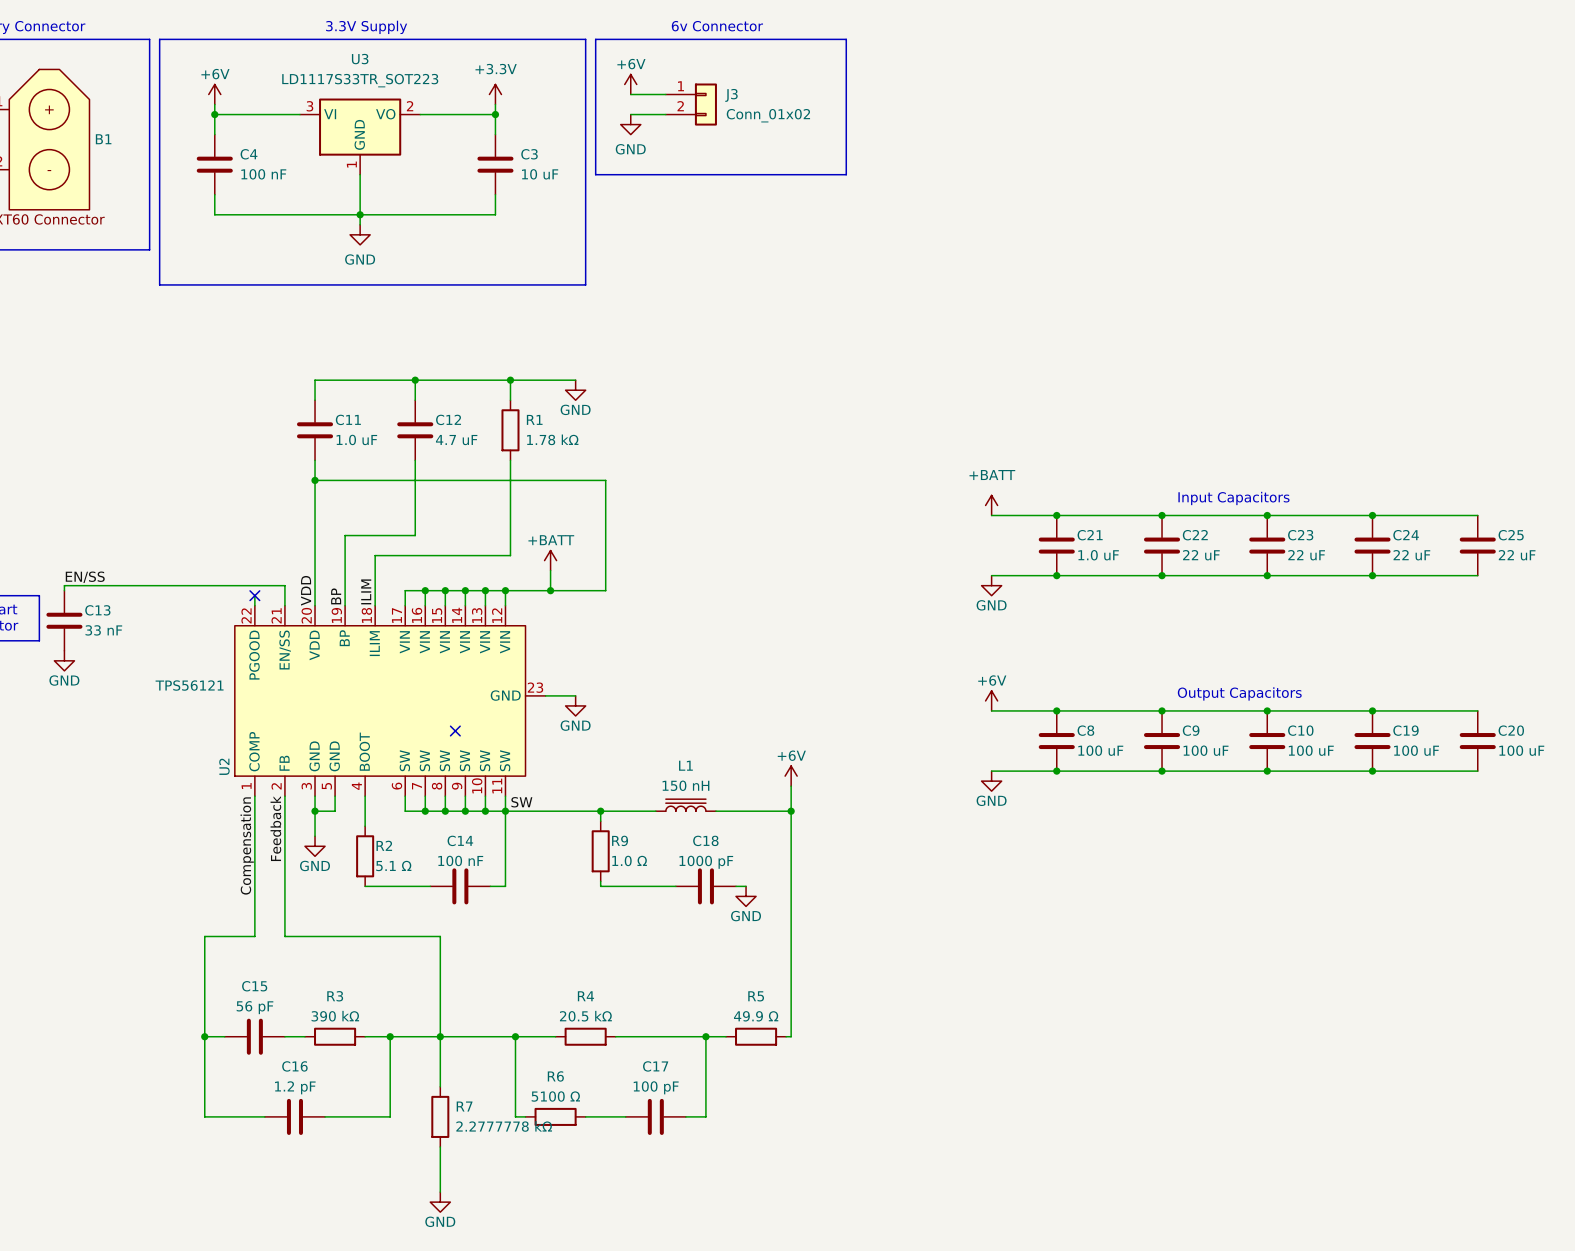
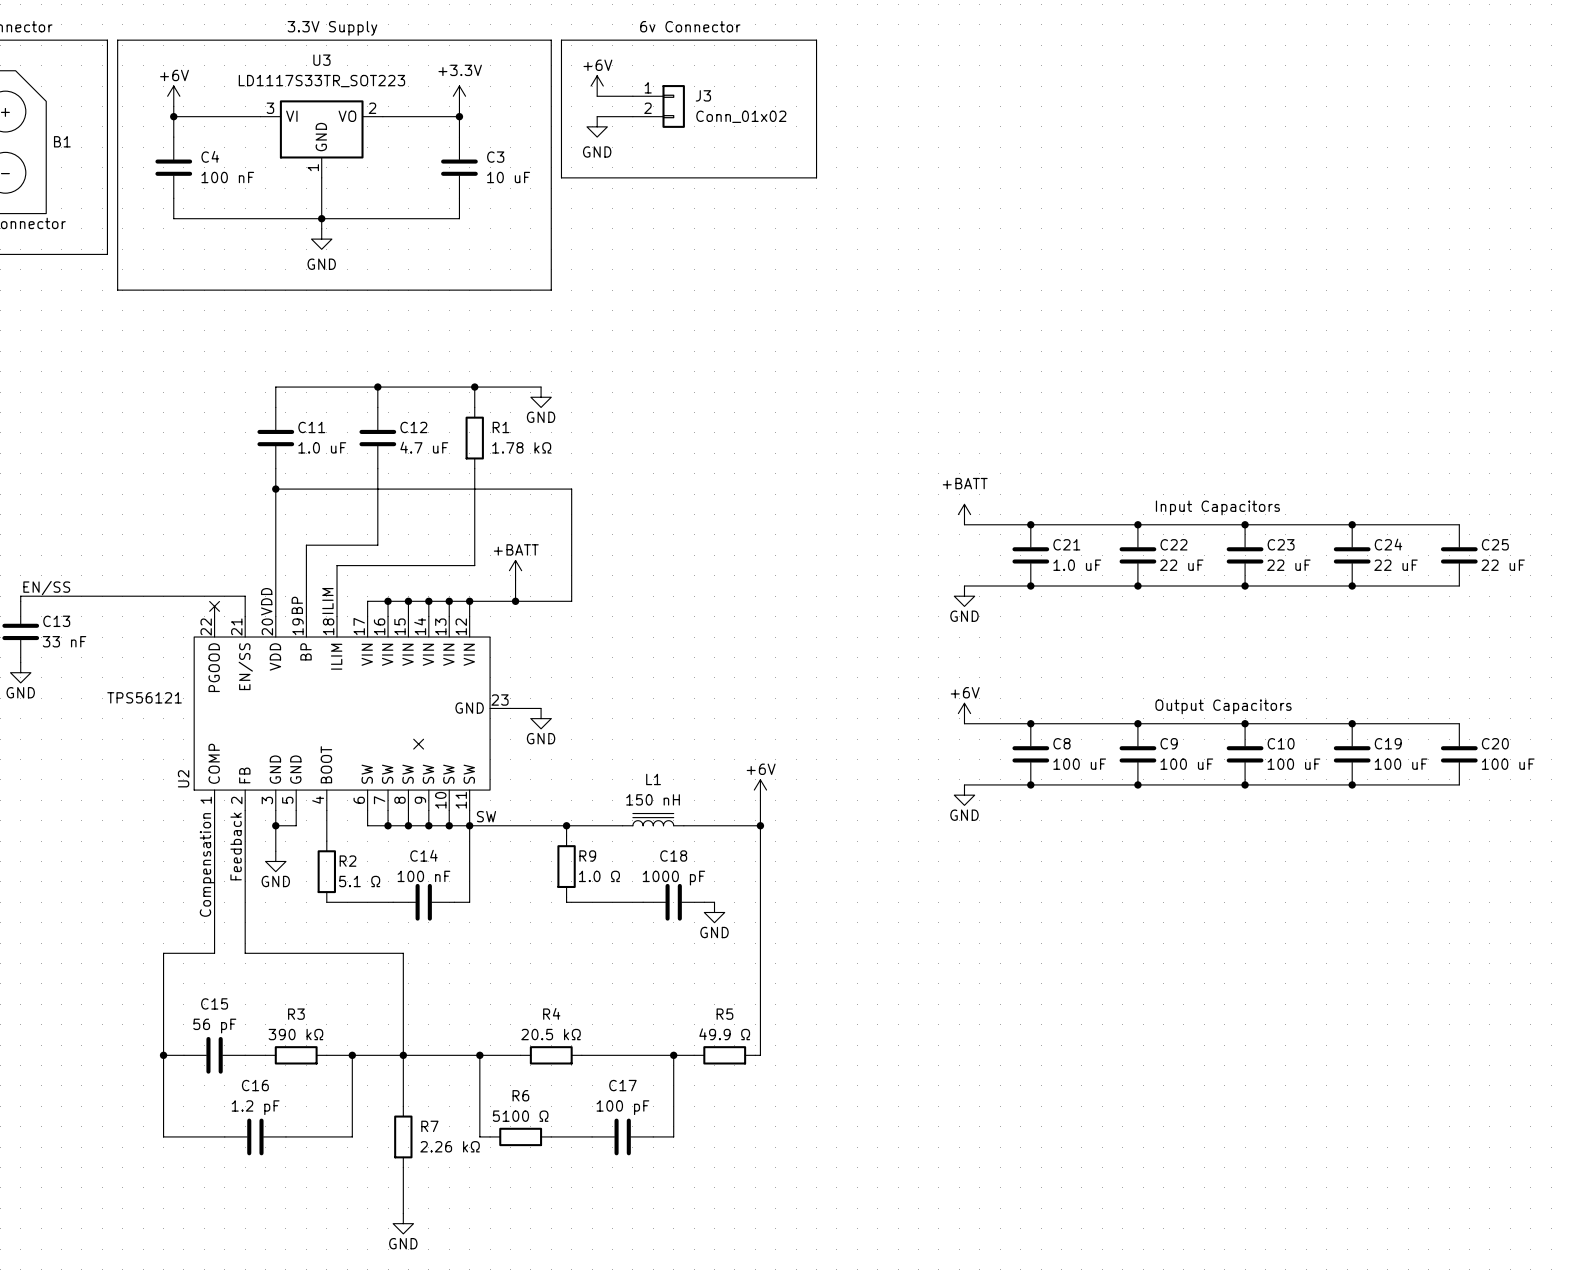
R7 value: 2.2777778 kΩ (504, 1126) -> 2.26 kΩ (450, 1146)

